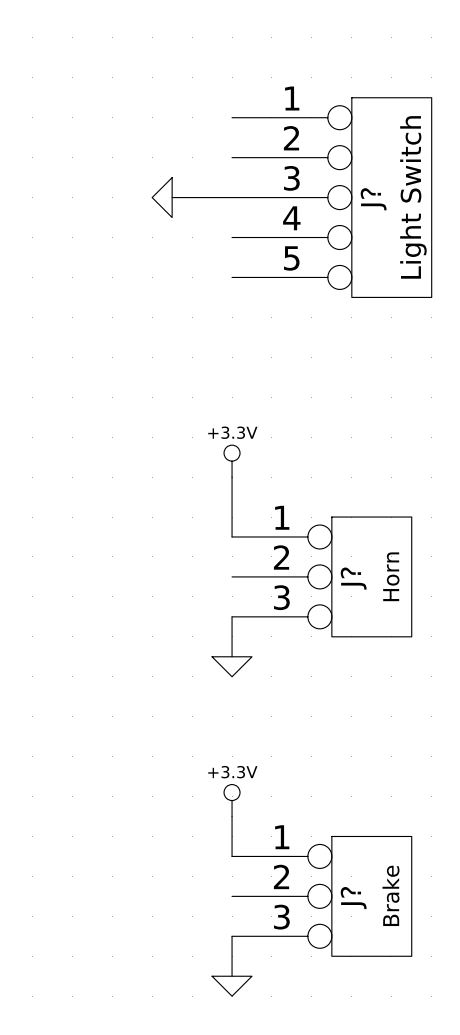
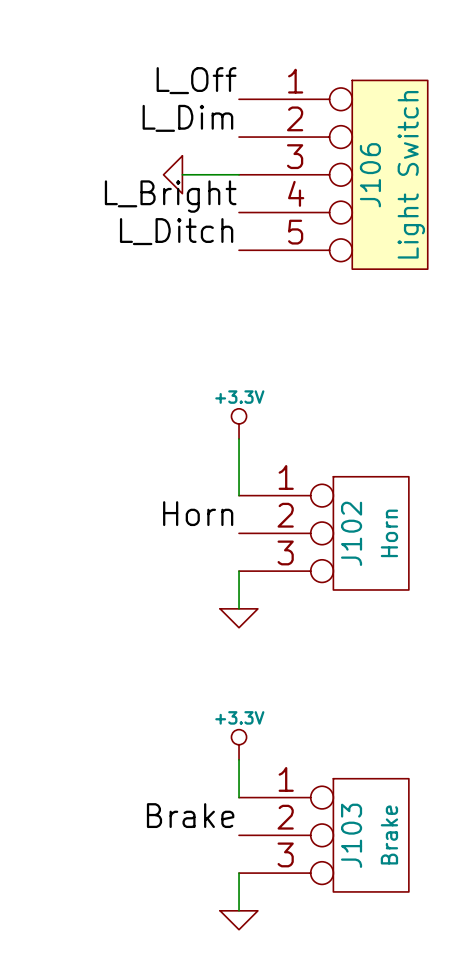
label: none -> L_Off (196, 80)
label: none -> L_Dim (187, 118)
J? name: J? (373, 199) -> J106 (370, 175)
label: none -> L_Bright (170, 196)
label: none -> L_Ditch (176, 231)
label: none -> Horn (198, 513)
J? name: J? (353, 578) -> J102 (351, 533)
label: none -> Brake (190, 815)
J? name: J? (353, 898) -> J103 (351, 835)

